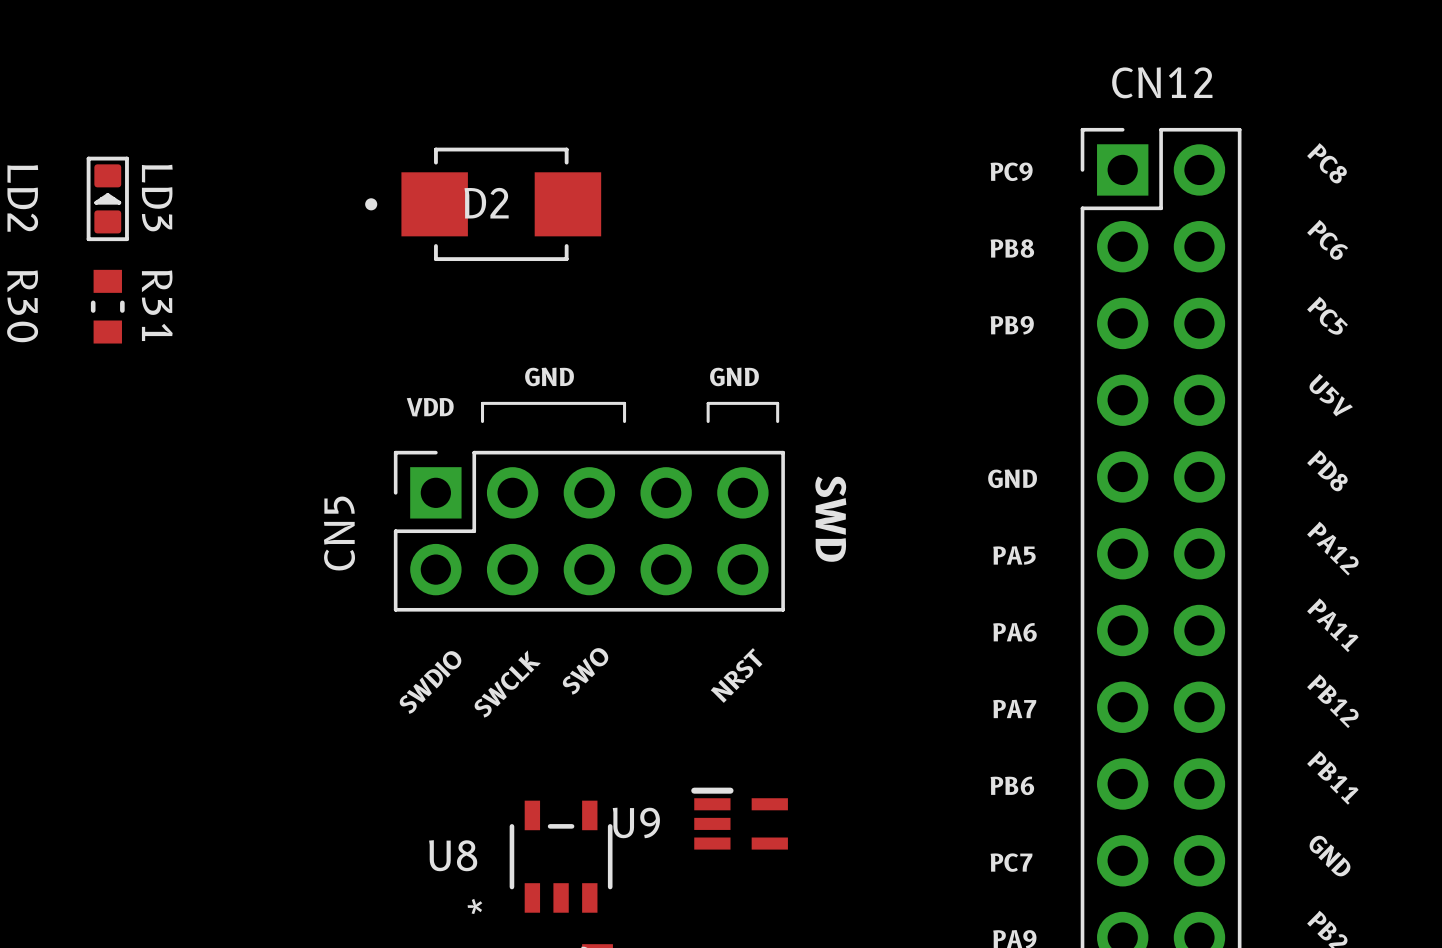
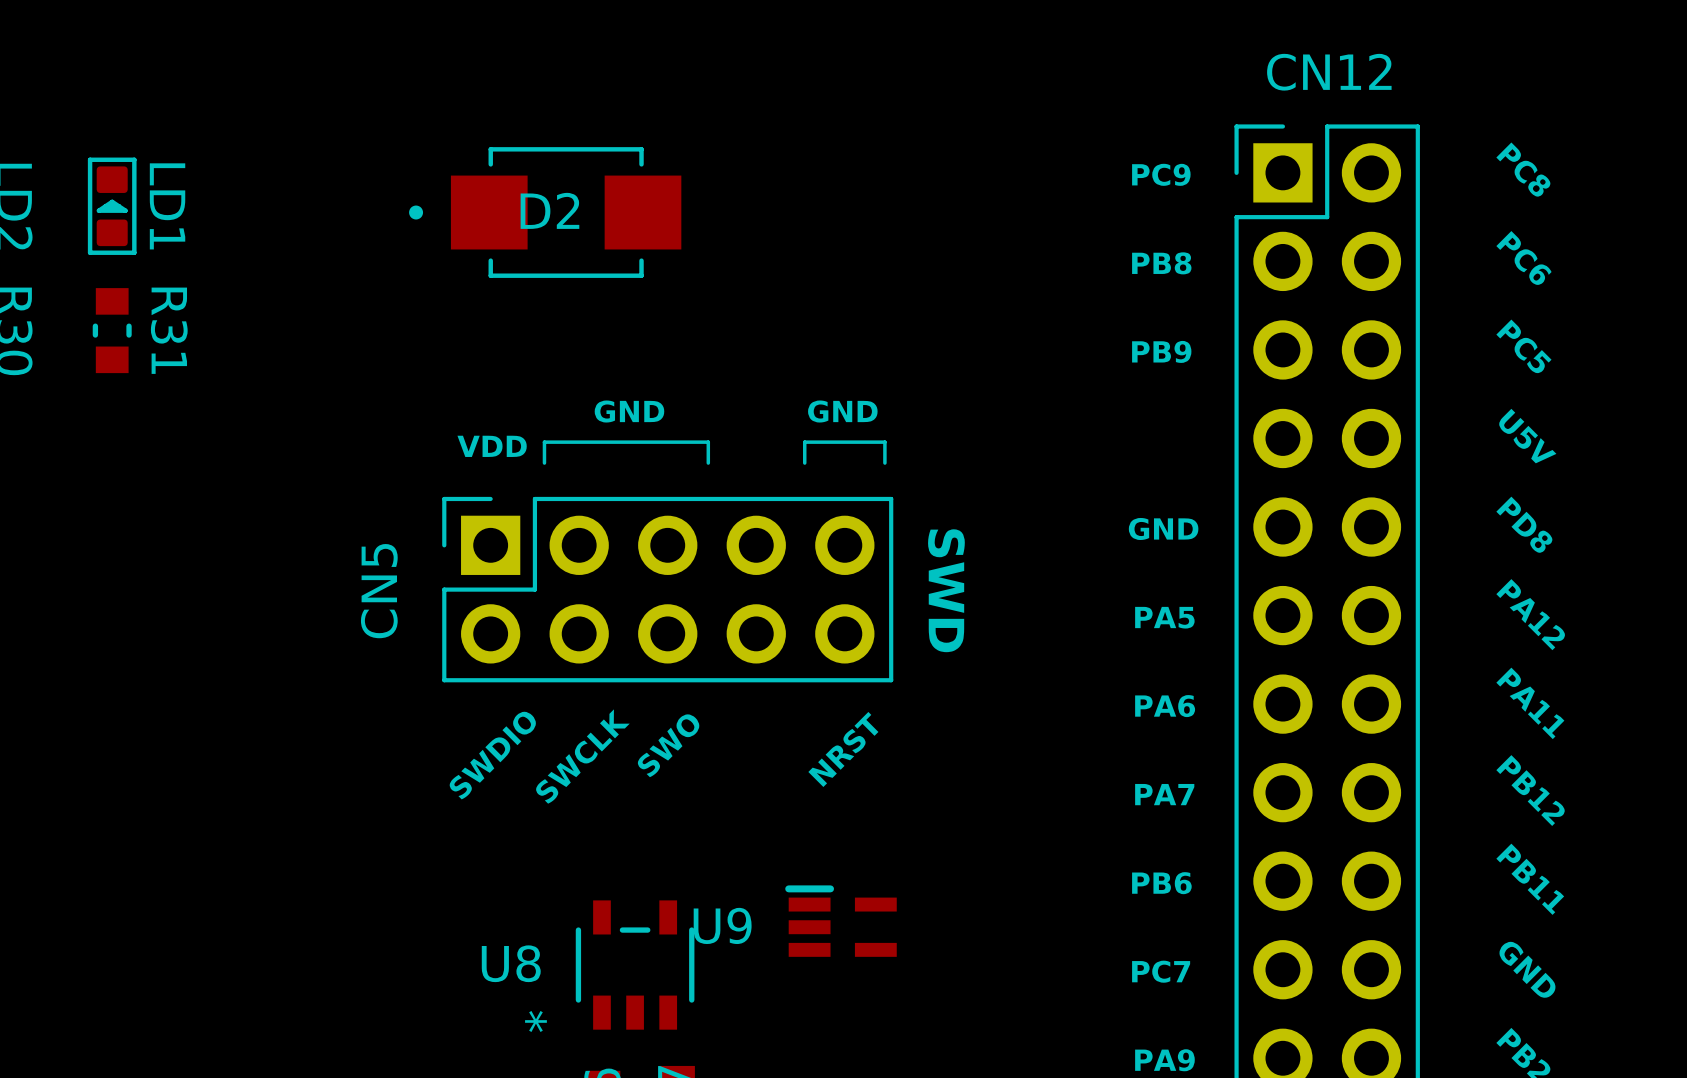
LD3 name: LD3 (157, 198) -> LD1 (167, 206)

